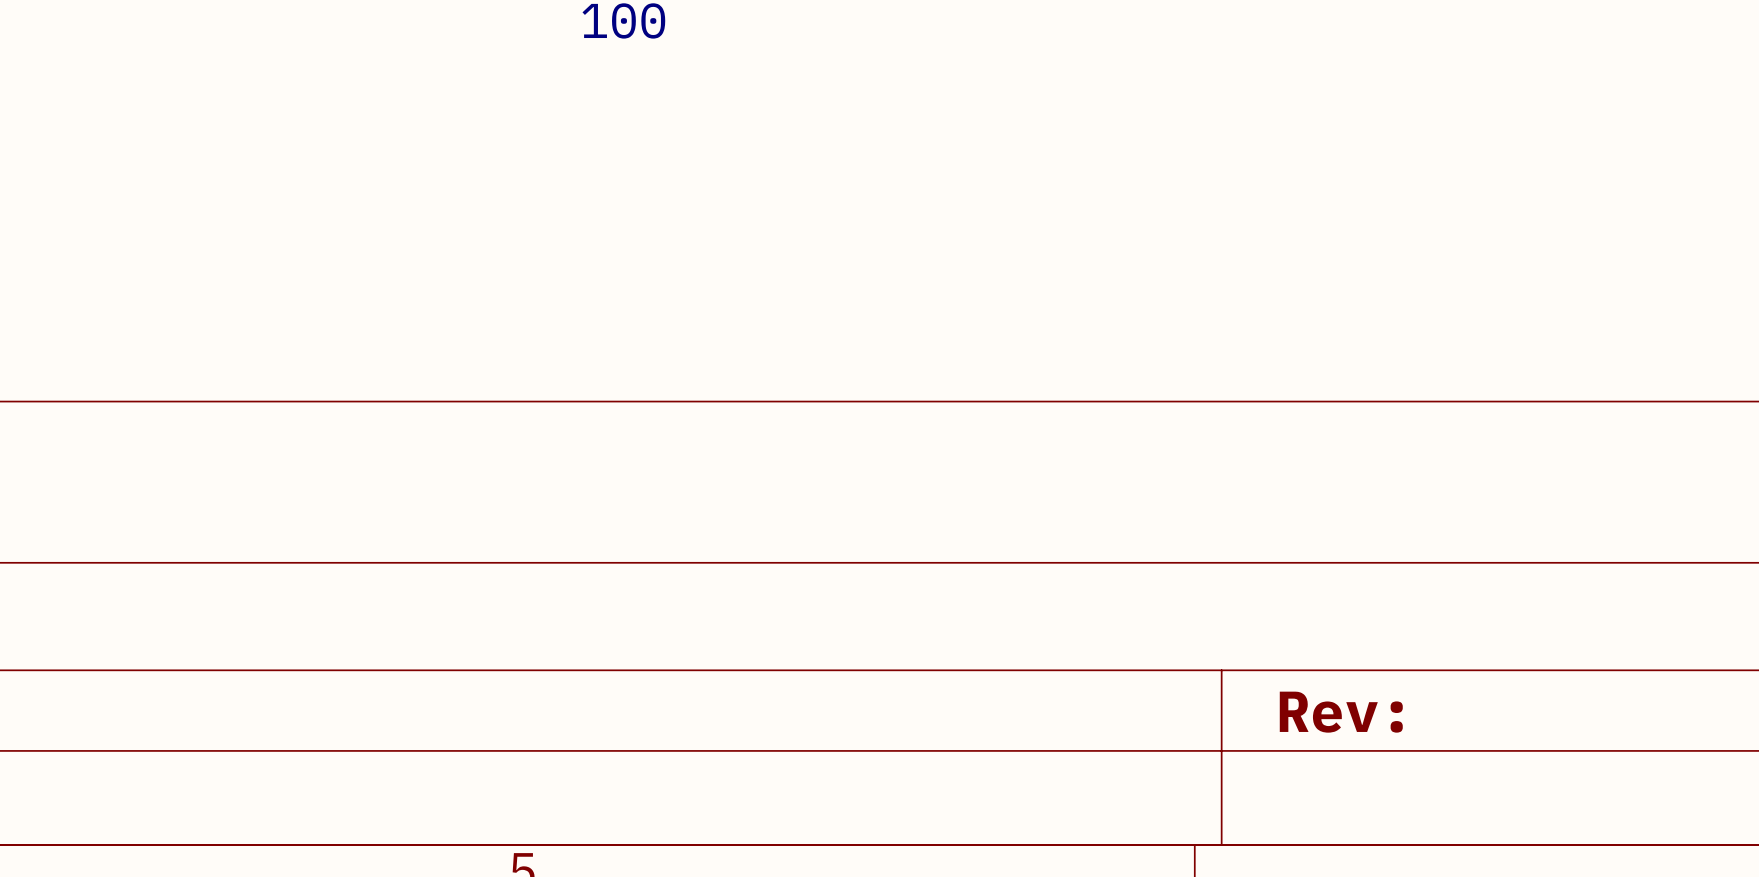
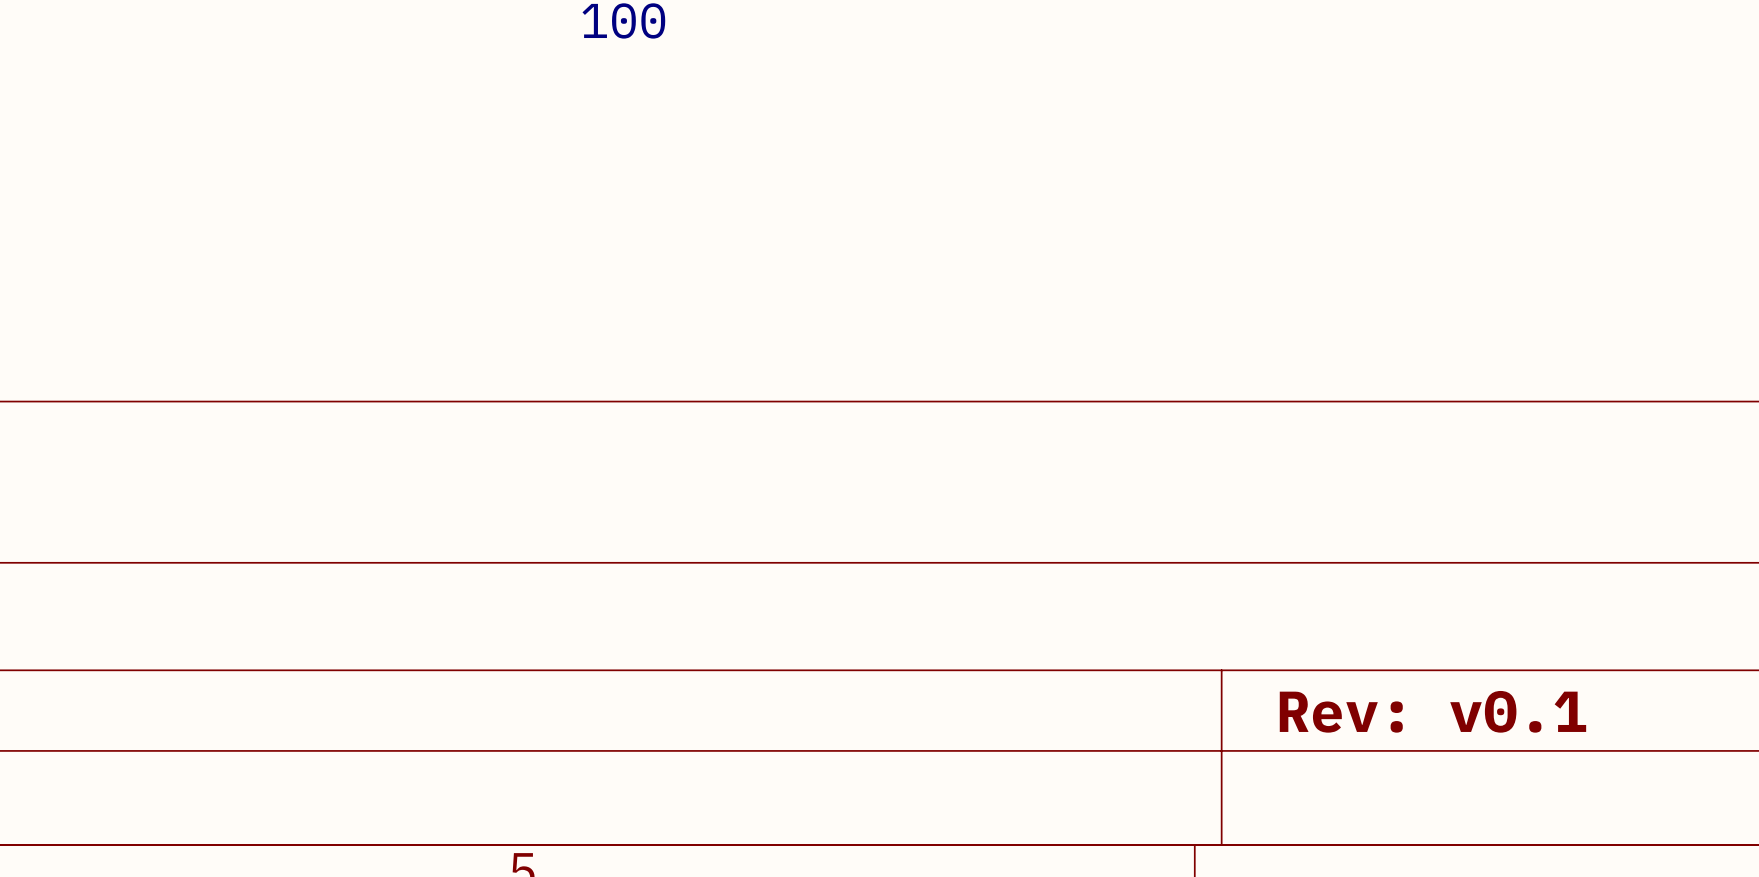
title block: Rev: (1341, 712) -> Rev: v0.1 (1432, 711)

